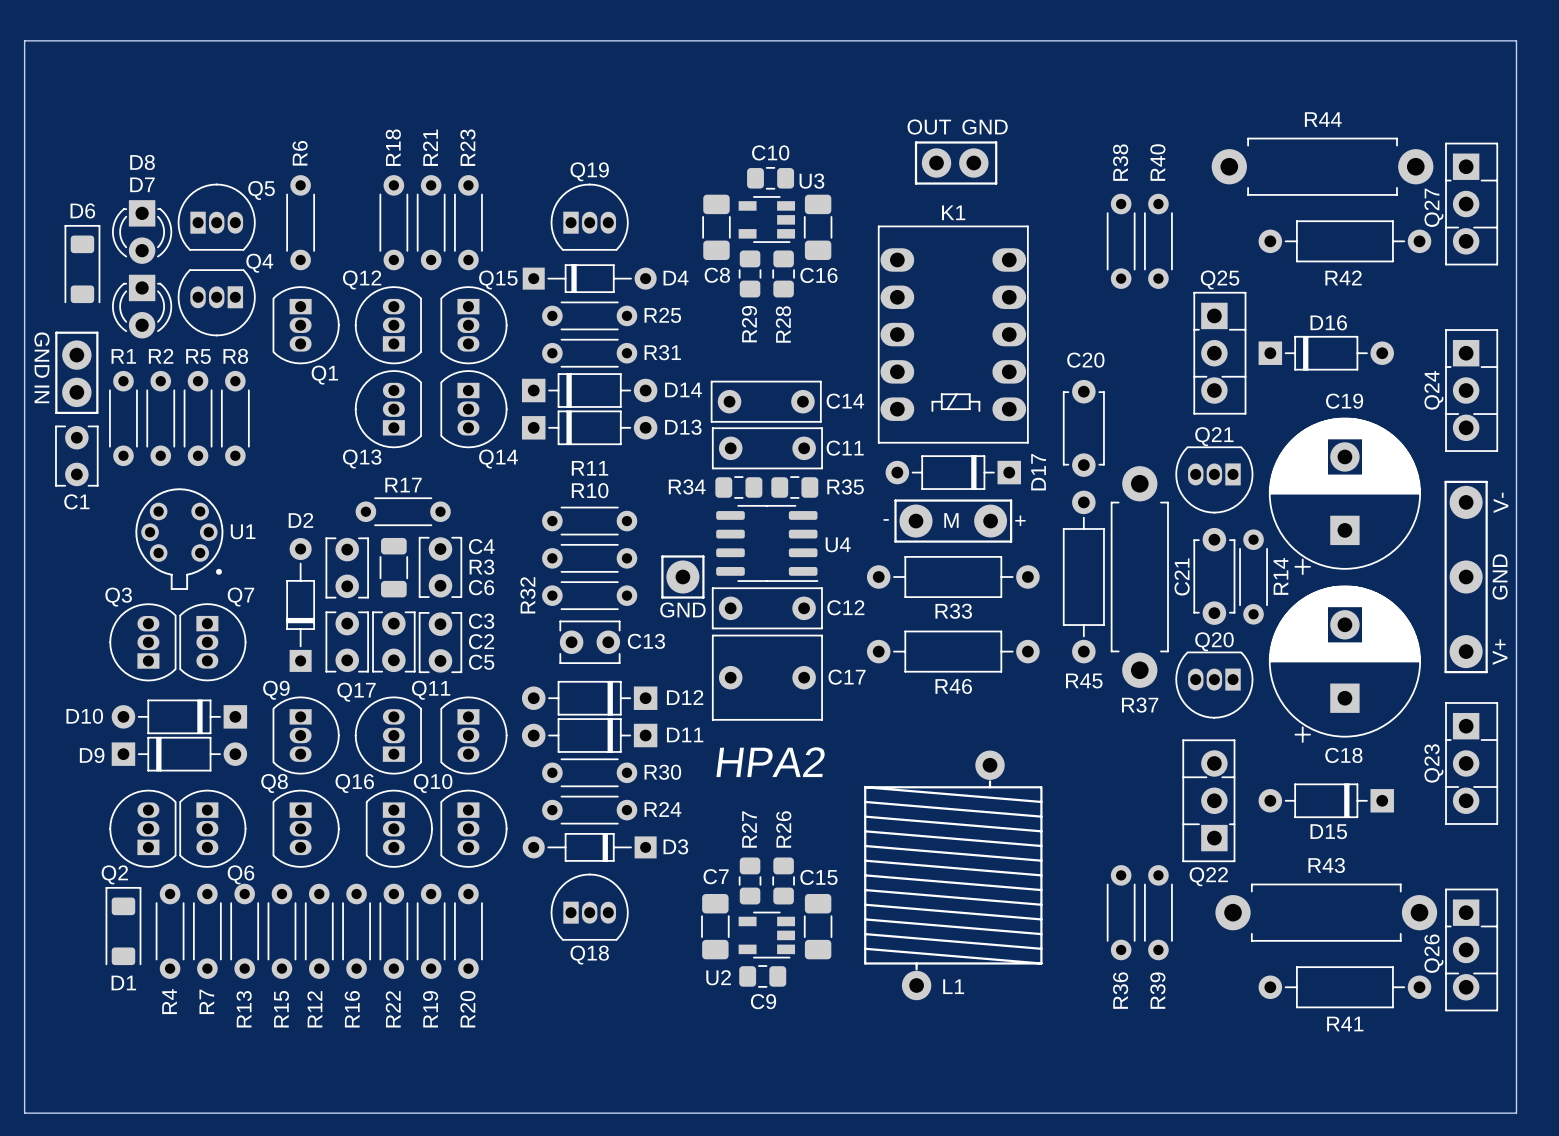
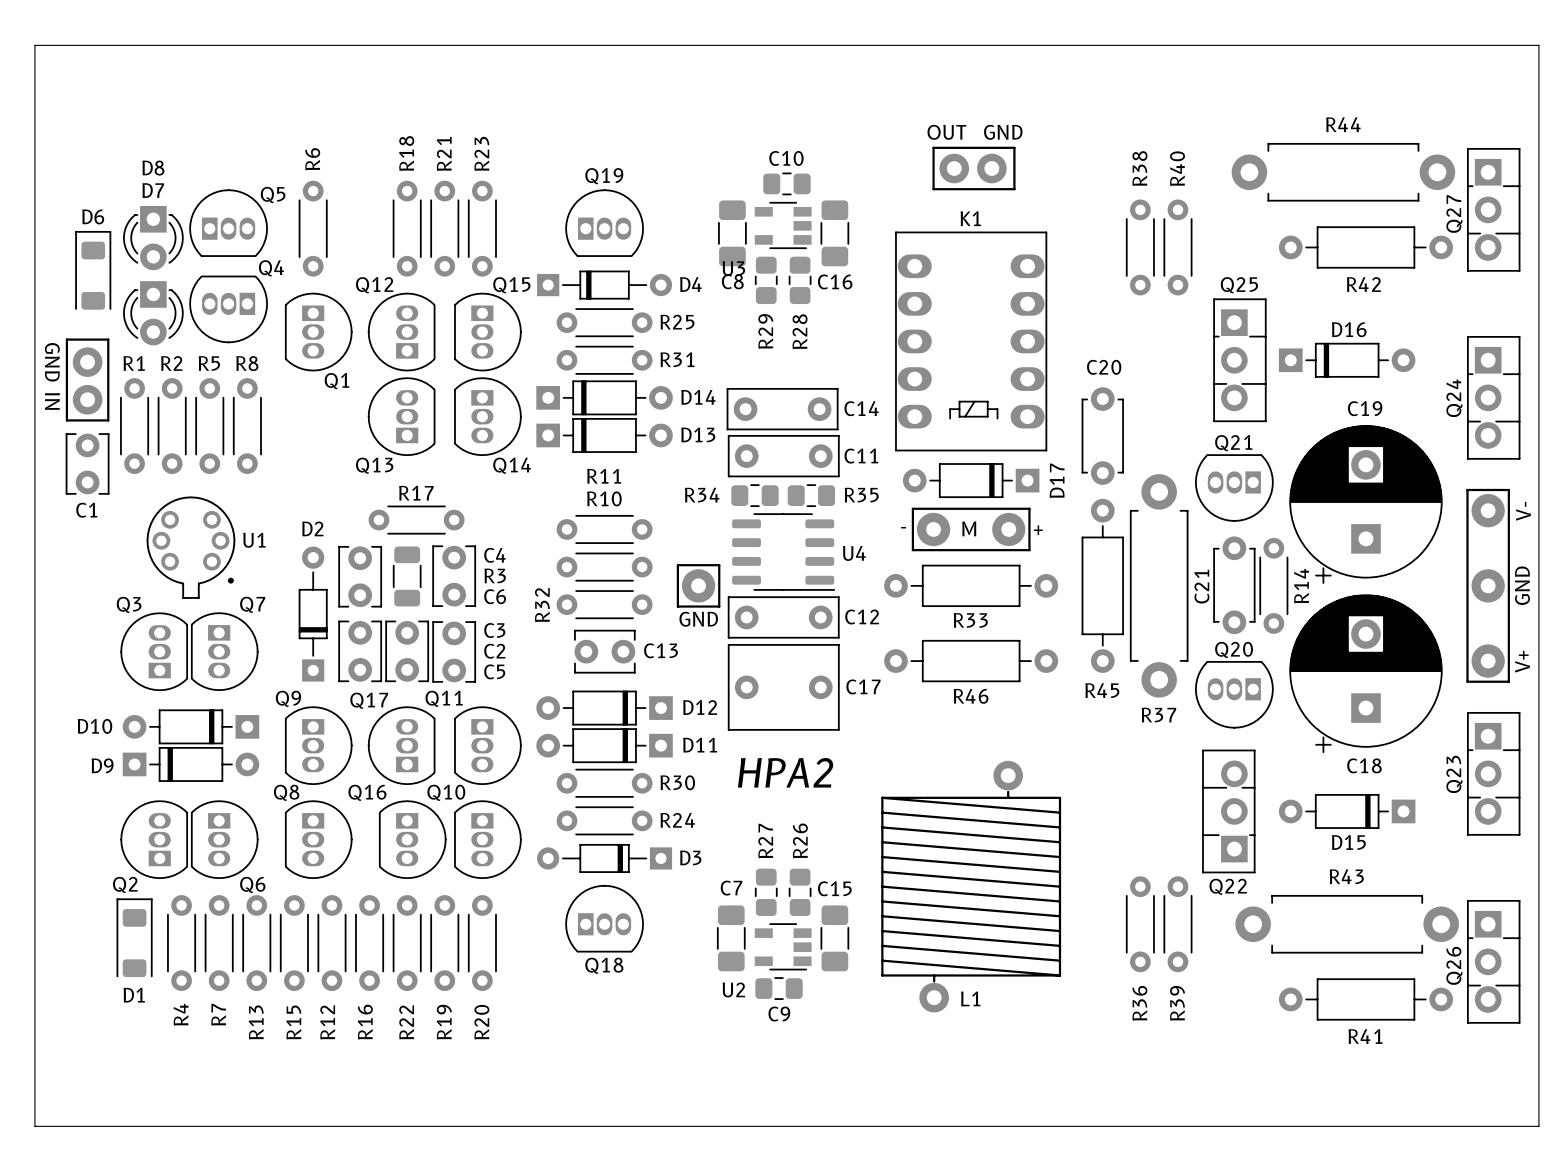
U3 name position: U3 (811, 181) -> U3 (733, 268)

